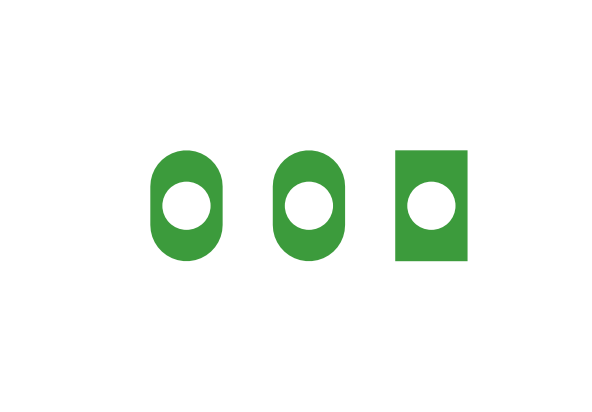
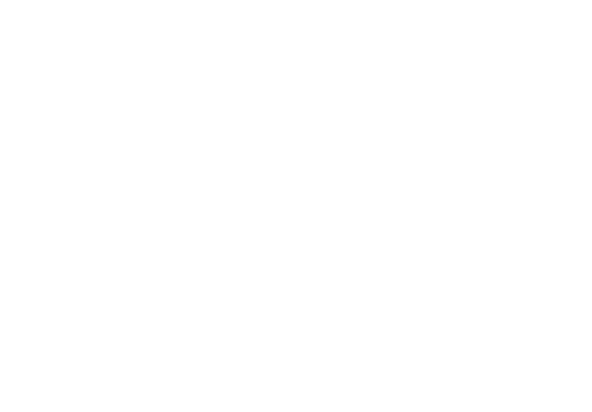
part: (308, 205) -> none

